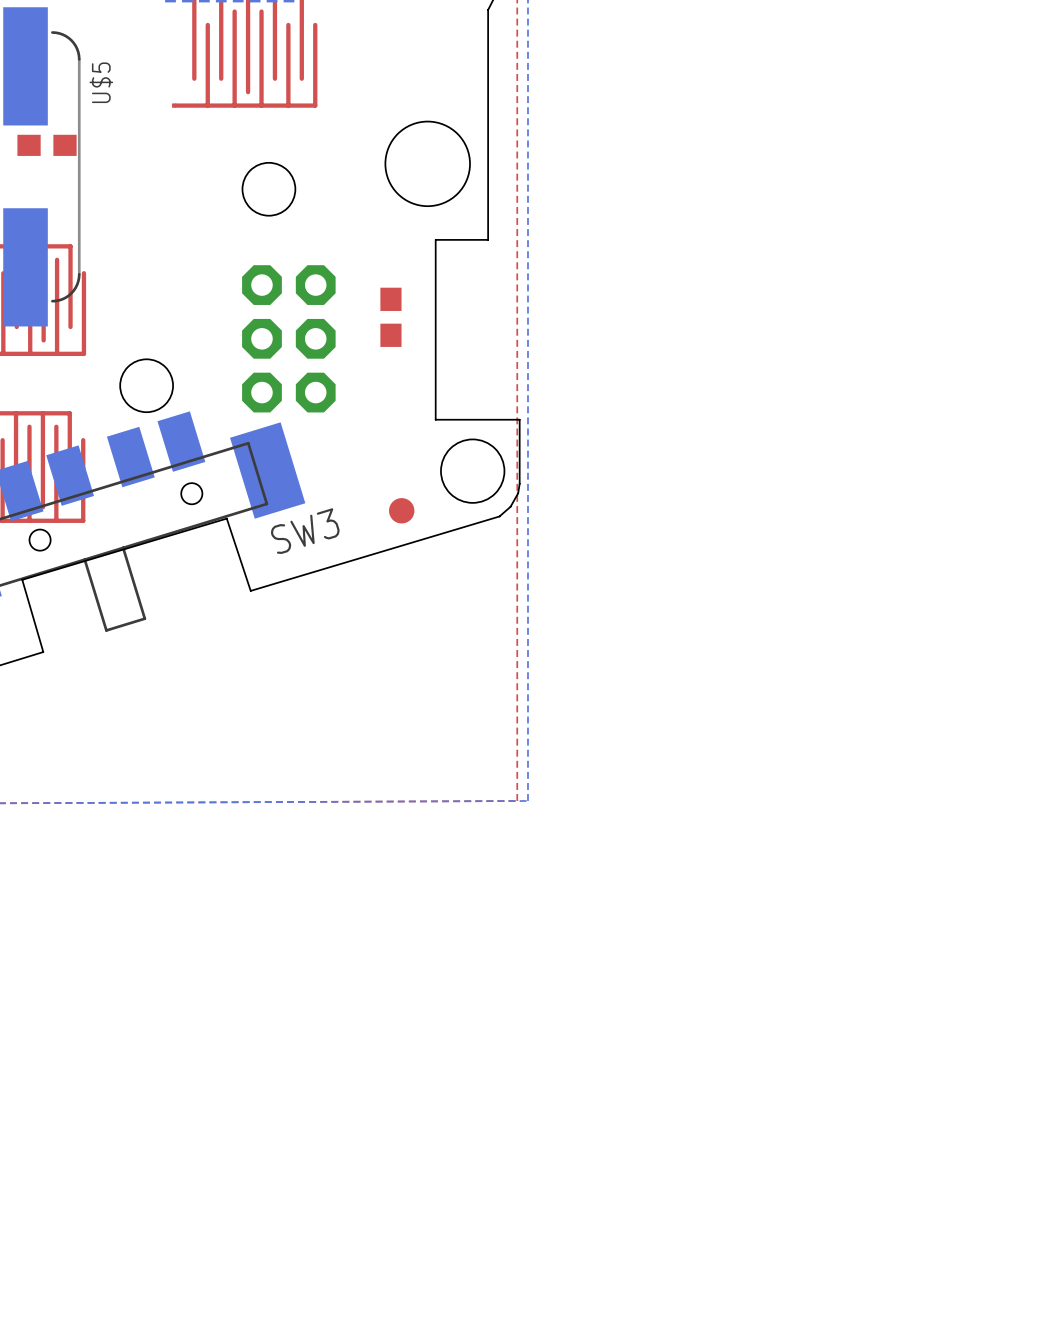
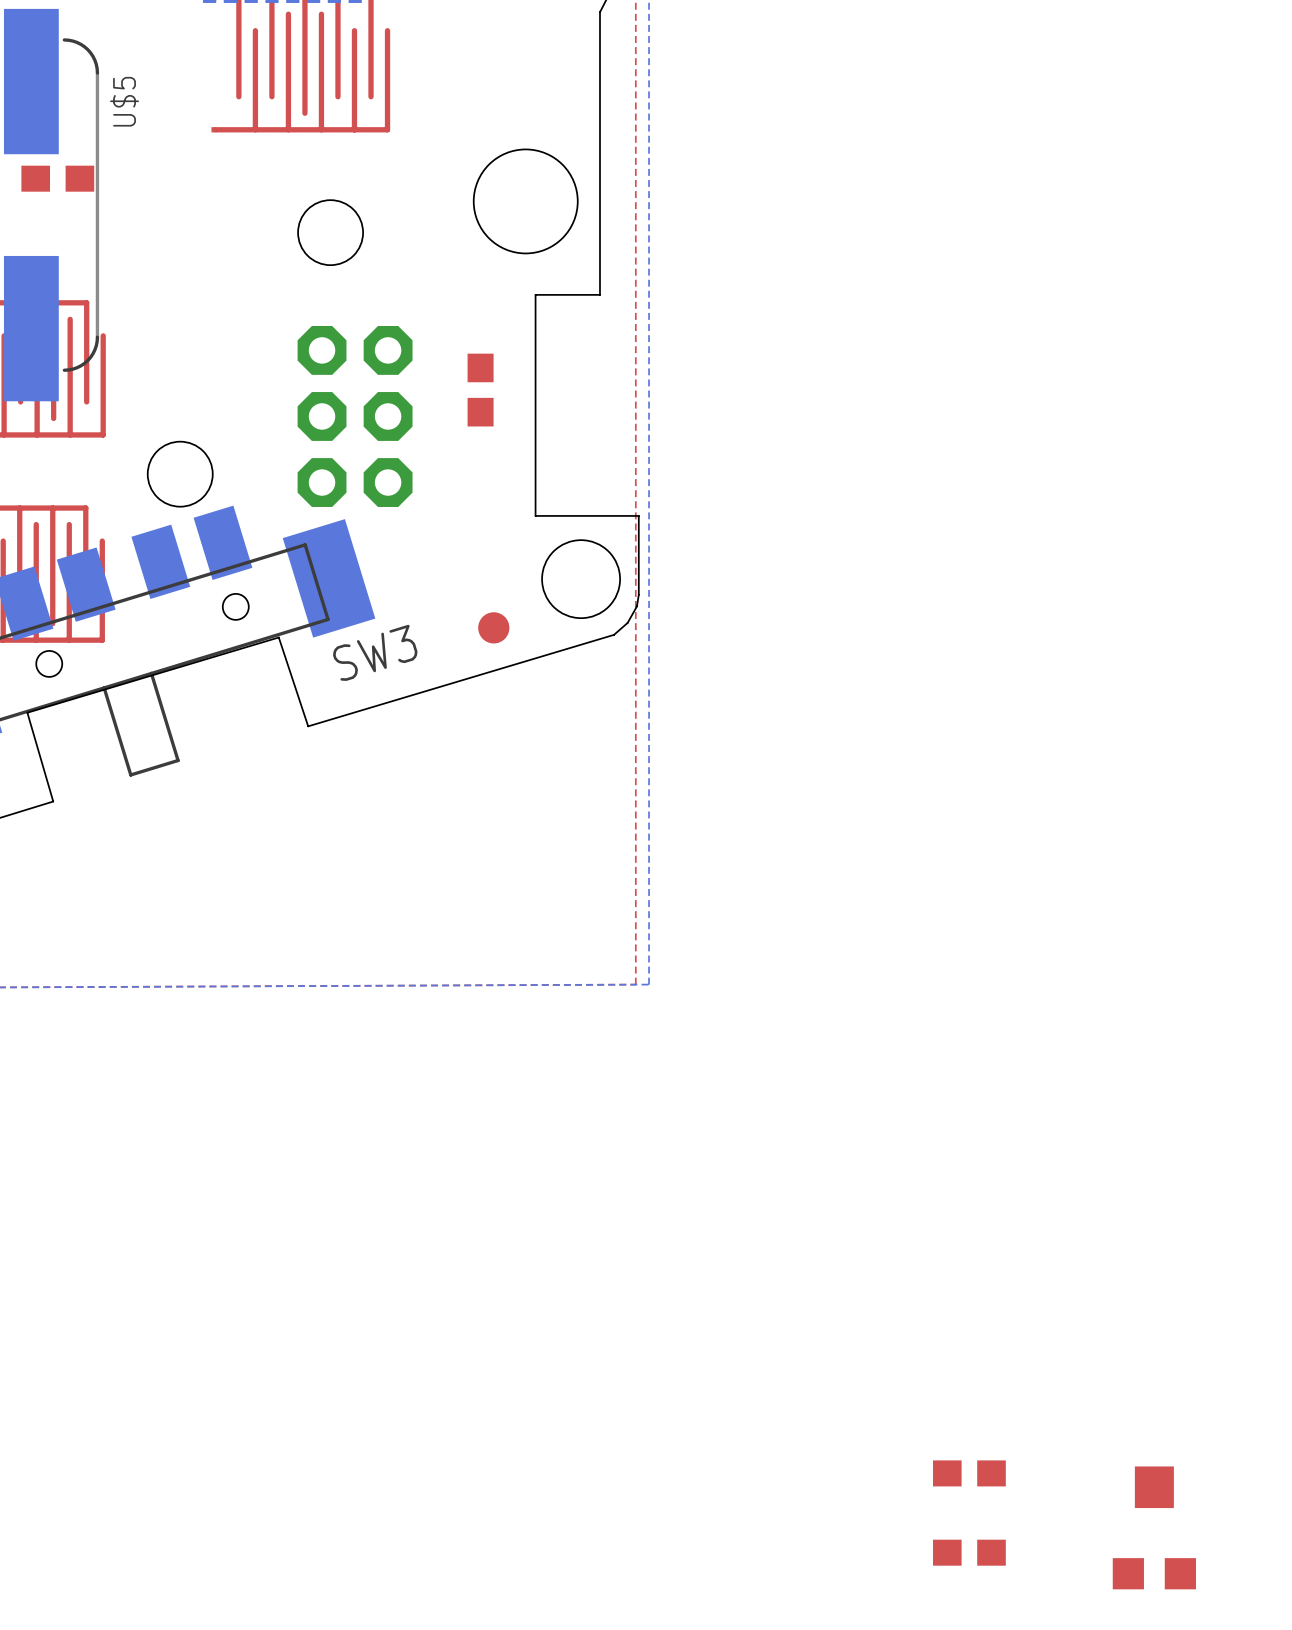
part: none -> (969, 1473)
part: none -> (1154, 1527)
part: none -> (969, 1552)

